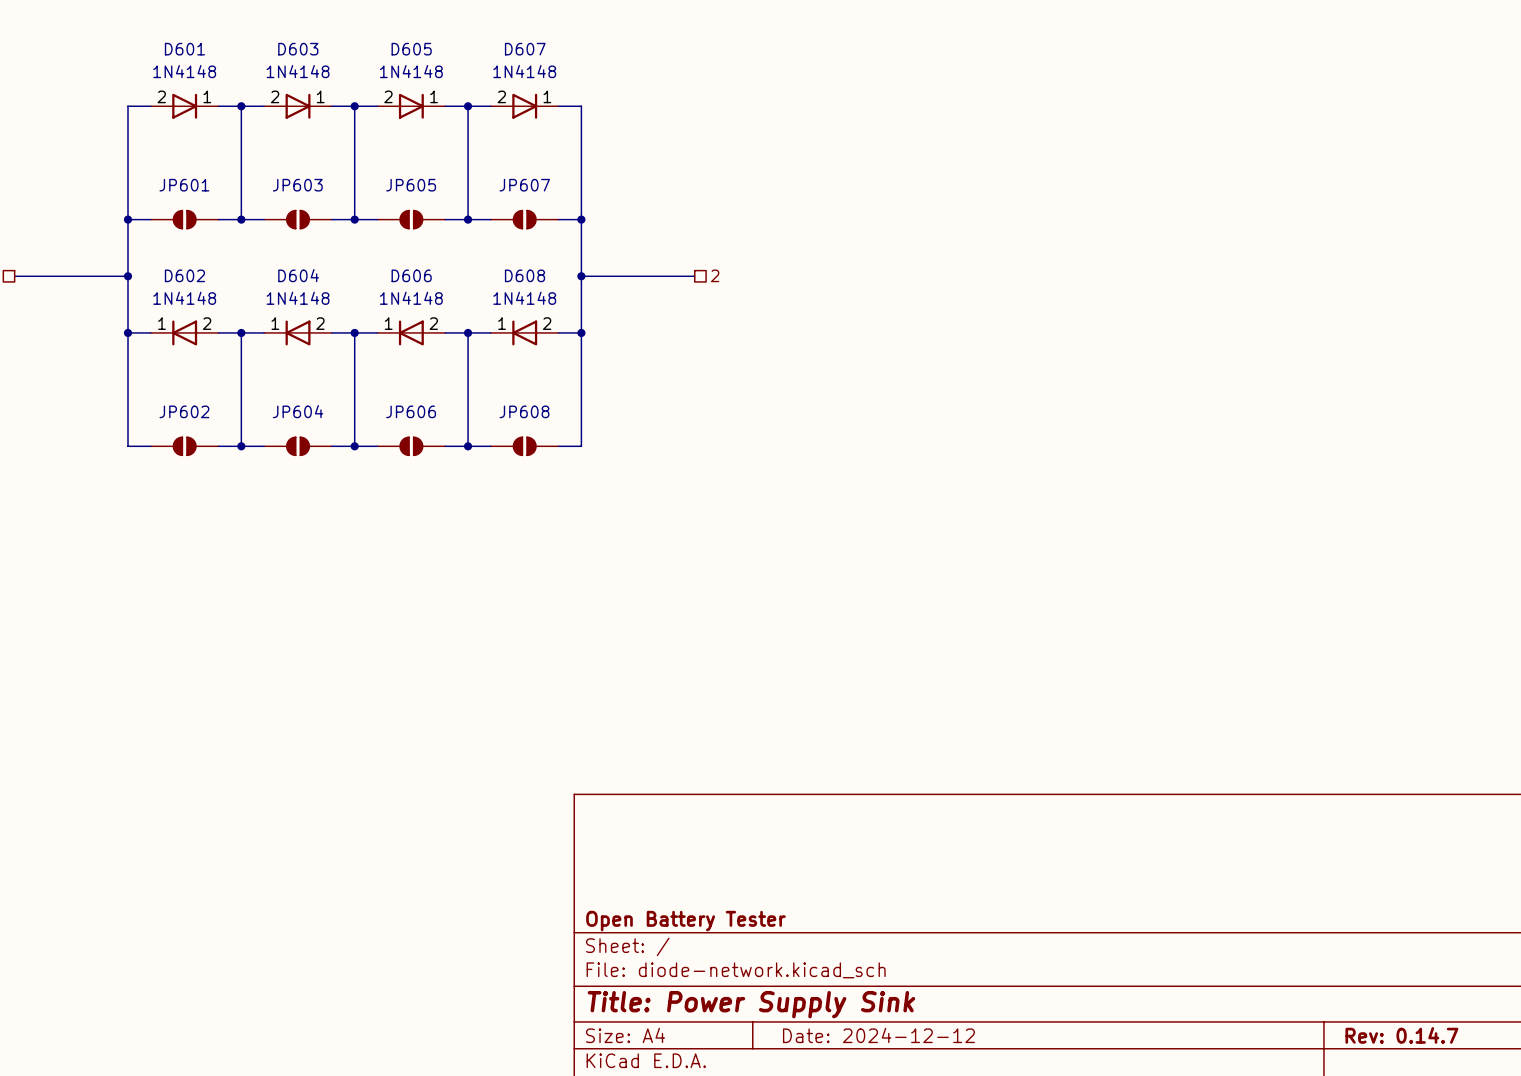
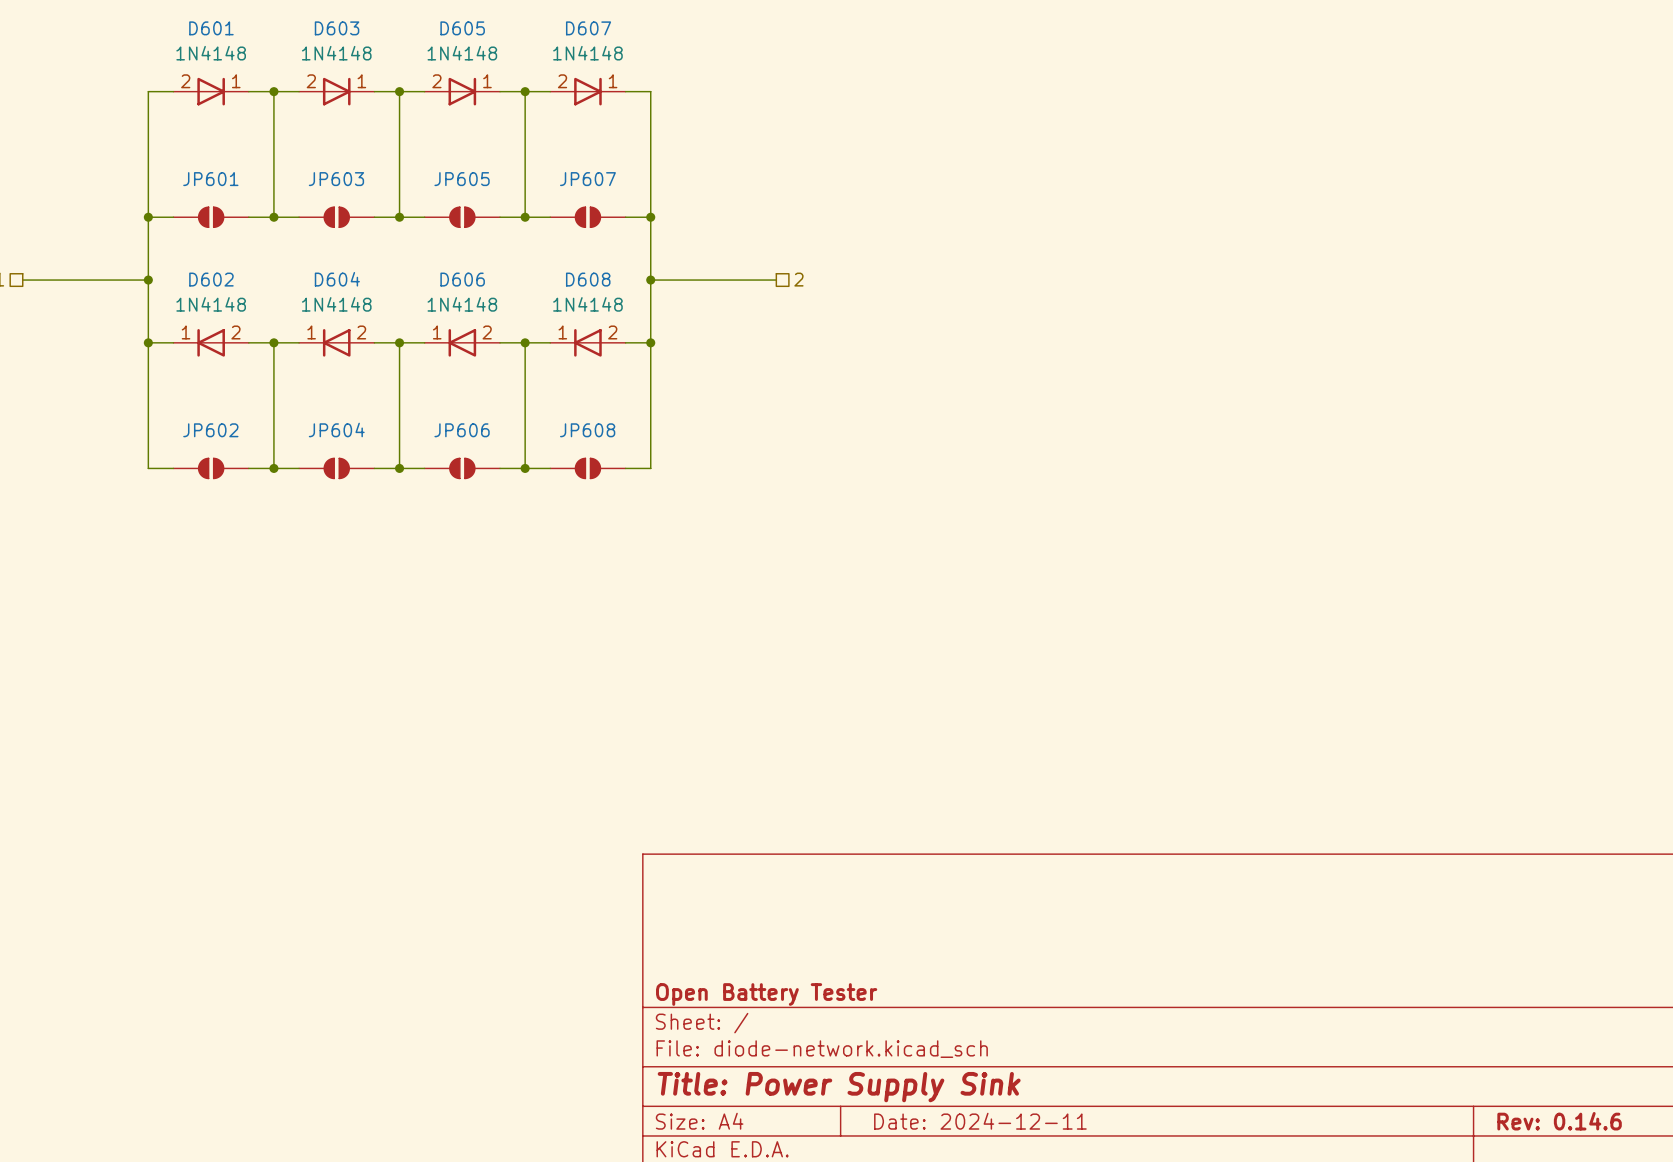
title block: Date: 2024-12-12 (878, 1035) -> Date: 2024-12-11 (980, 1121)
title block: Rev: 0.14.7 (1401, 1035) -> Rev: 0.14.6 (1559, 1121)

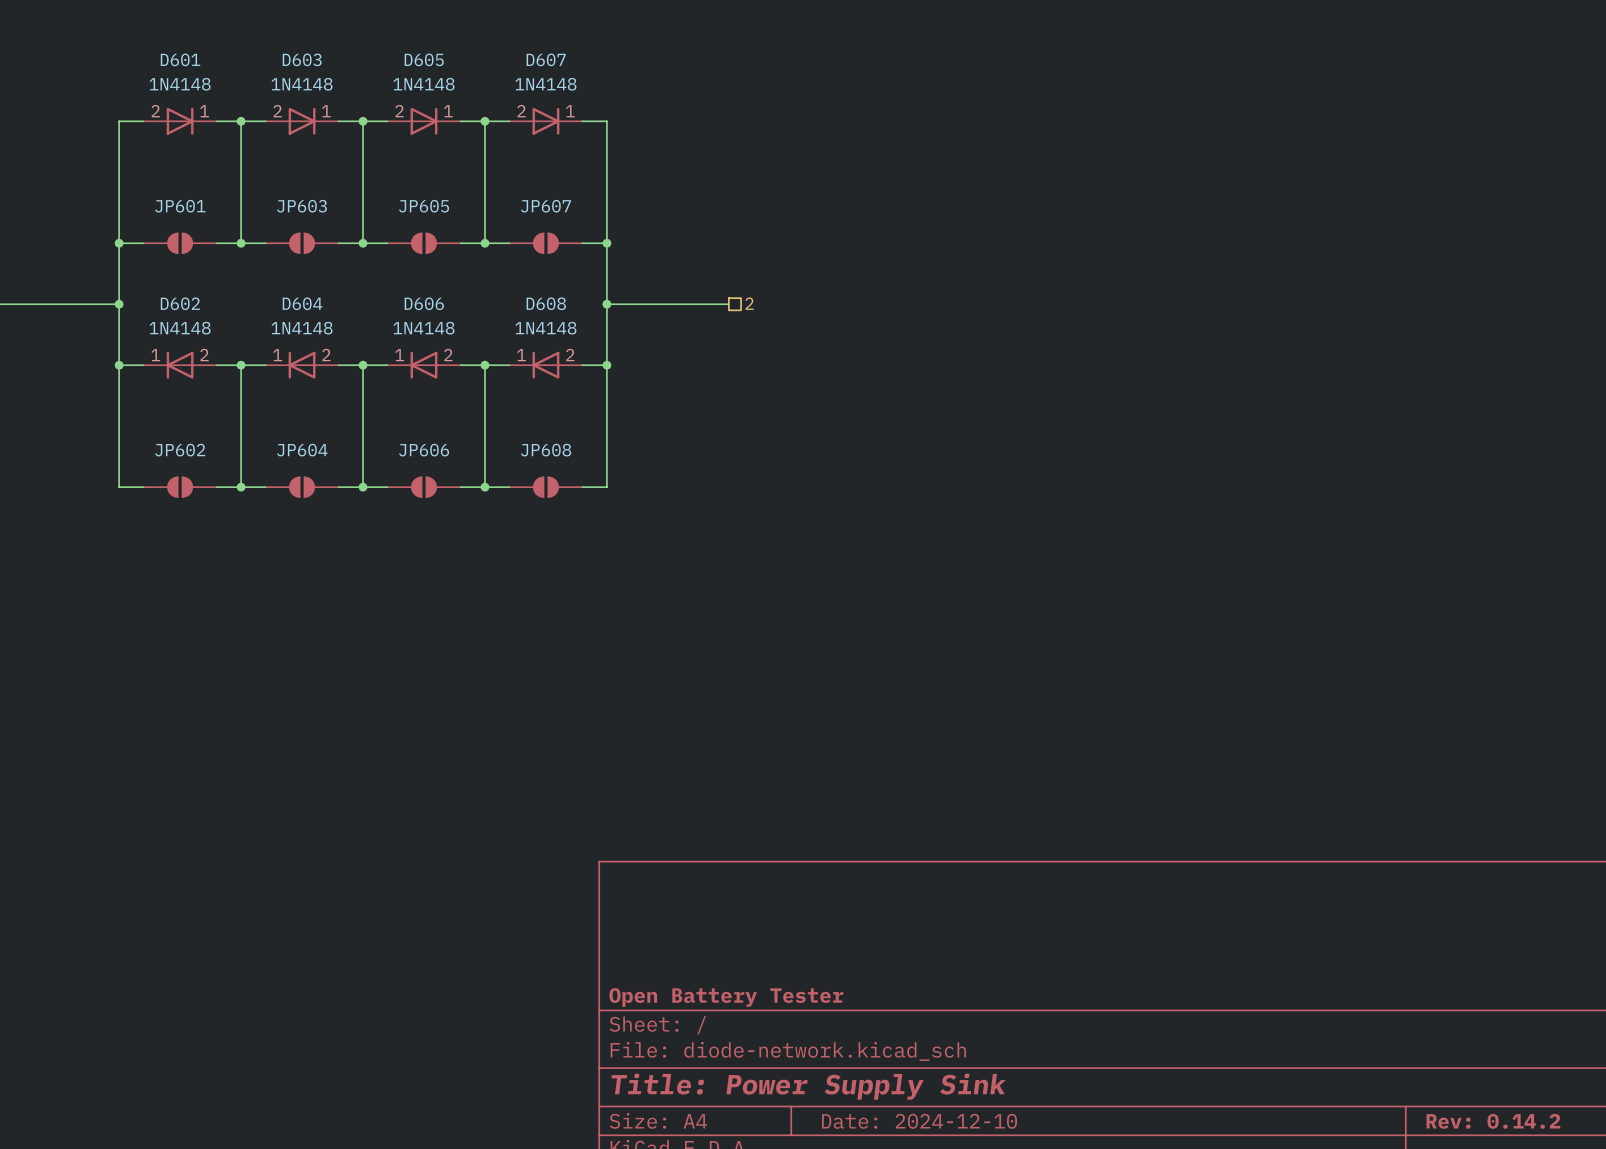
title block: Date: 2024-12-11 (980, 1121) -> Date: 2024-12-10 (919, 1121)
title block: Rev: 0.14.6 (1559, 1121) -> Rev: 0.14.2 (1493, 1121)

